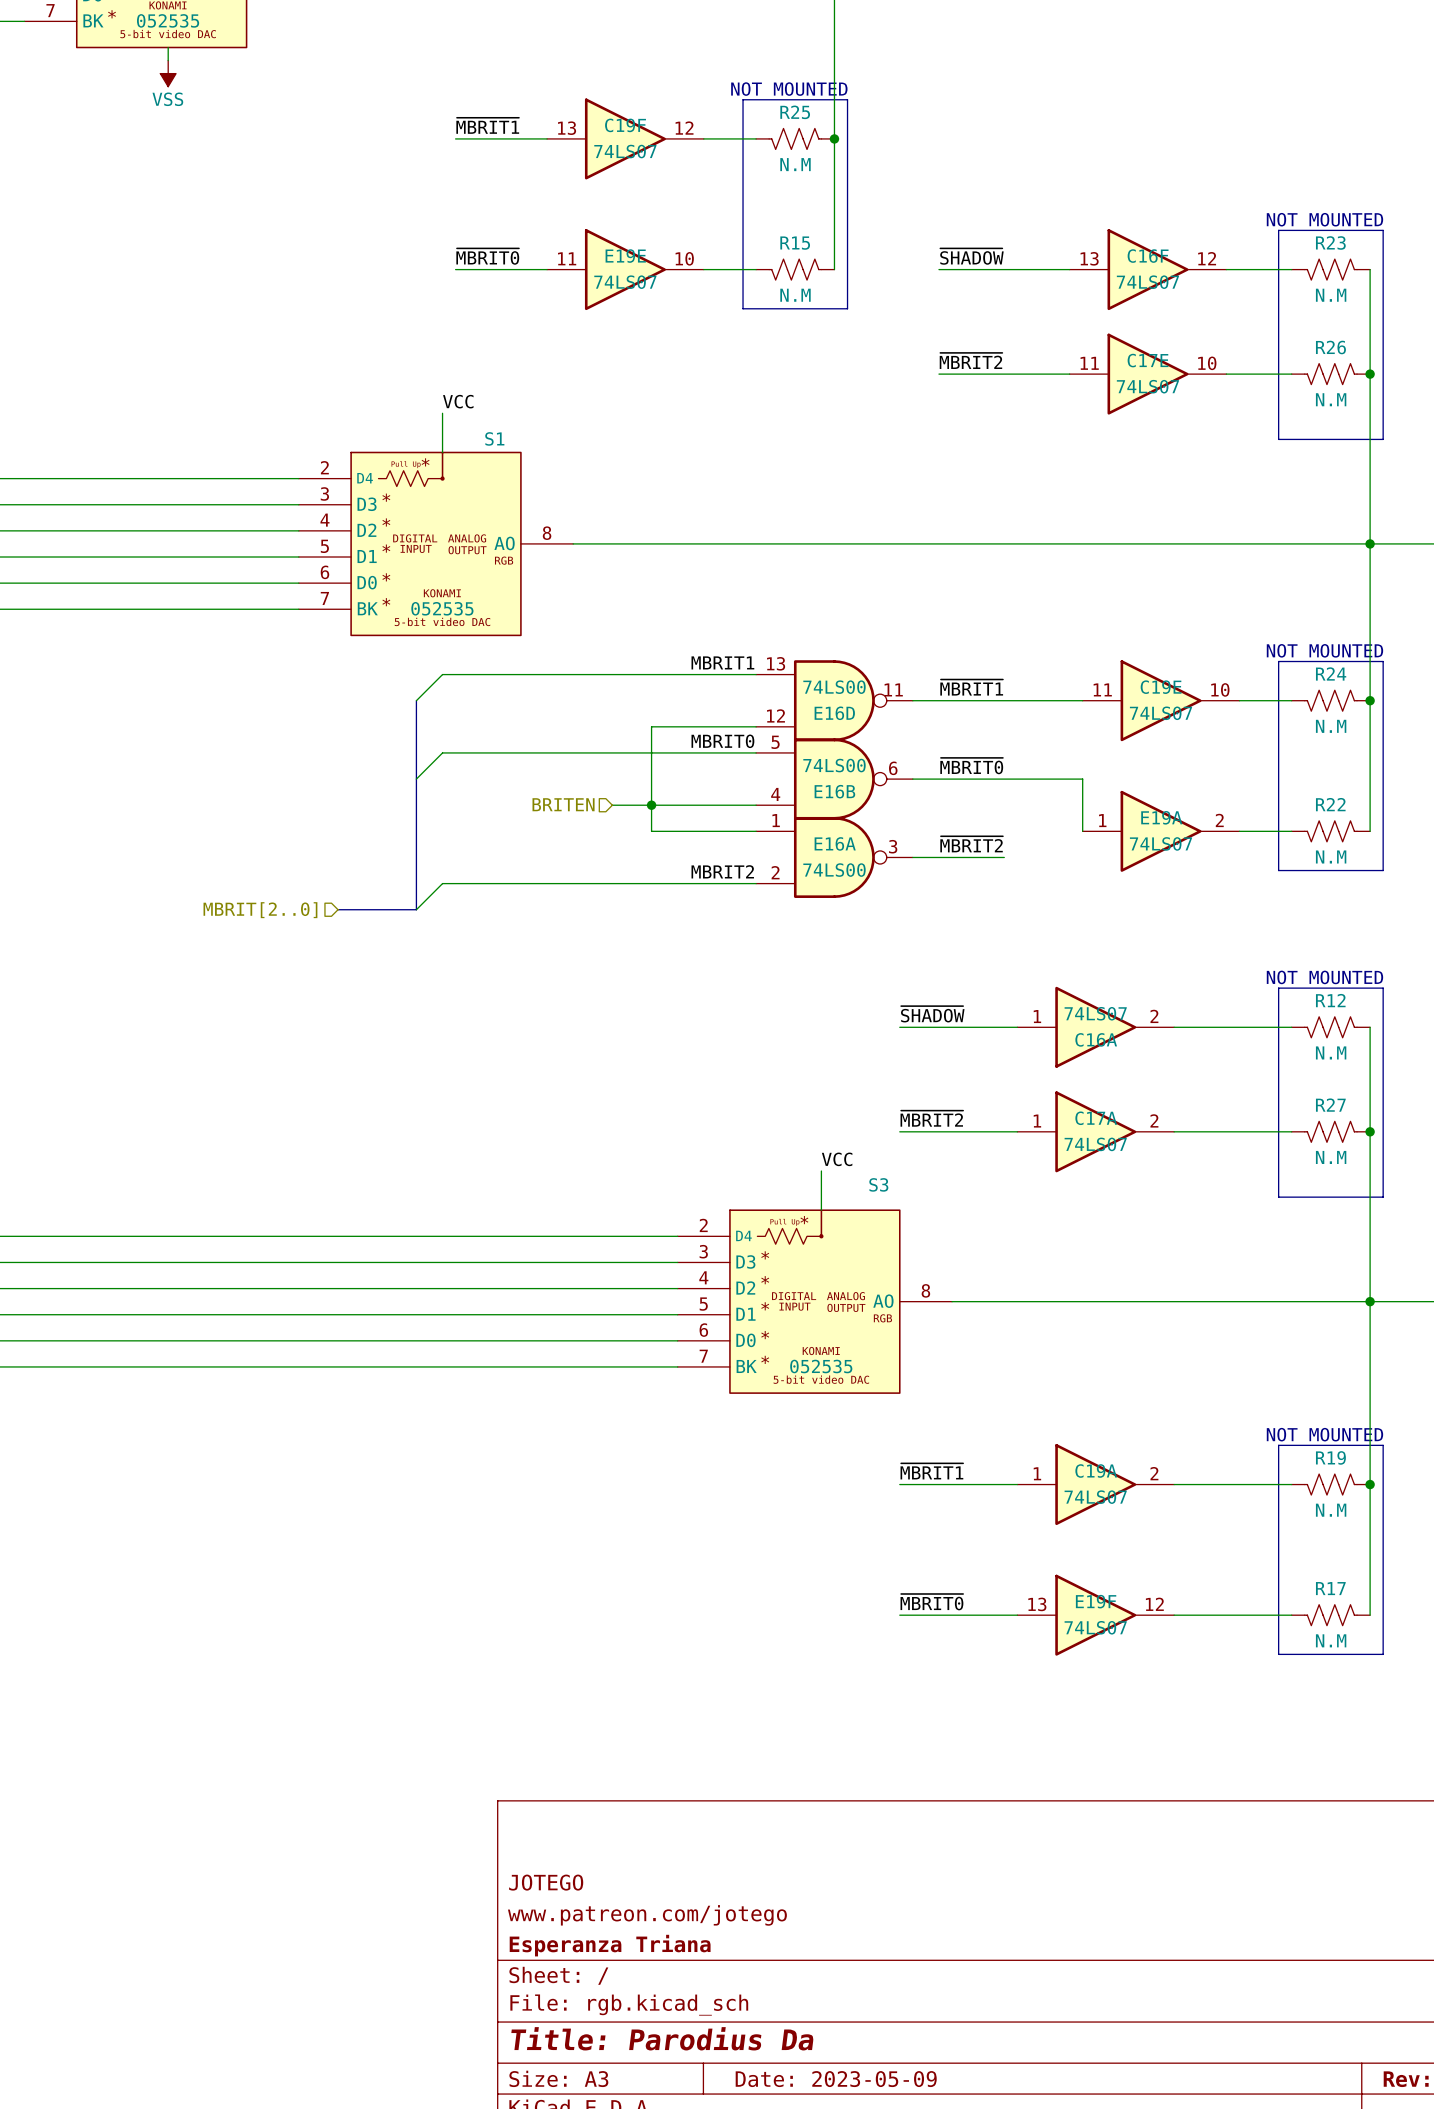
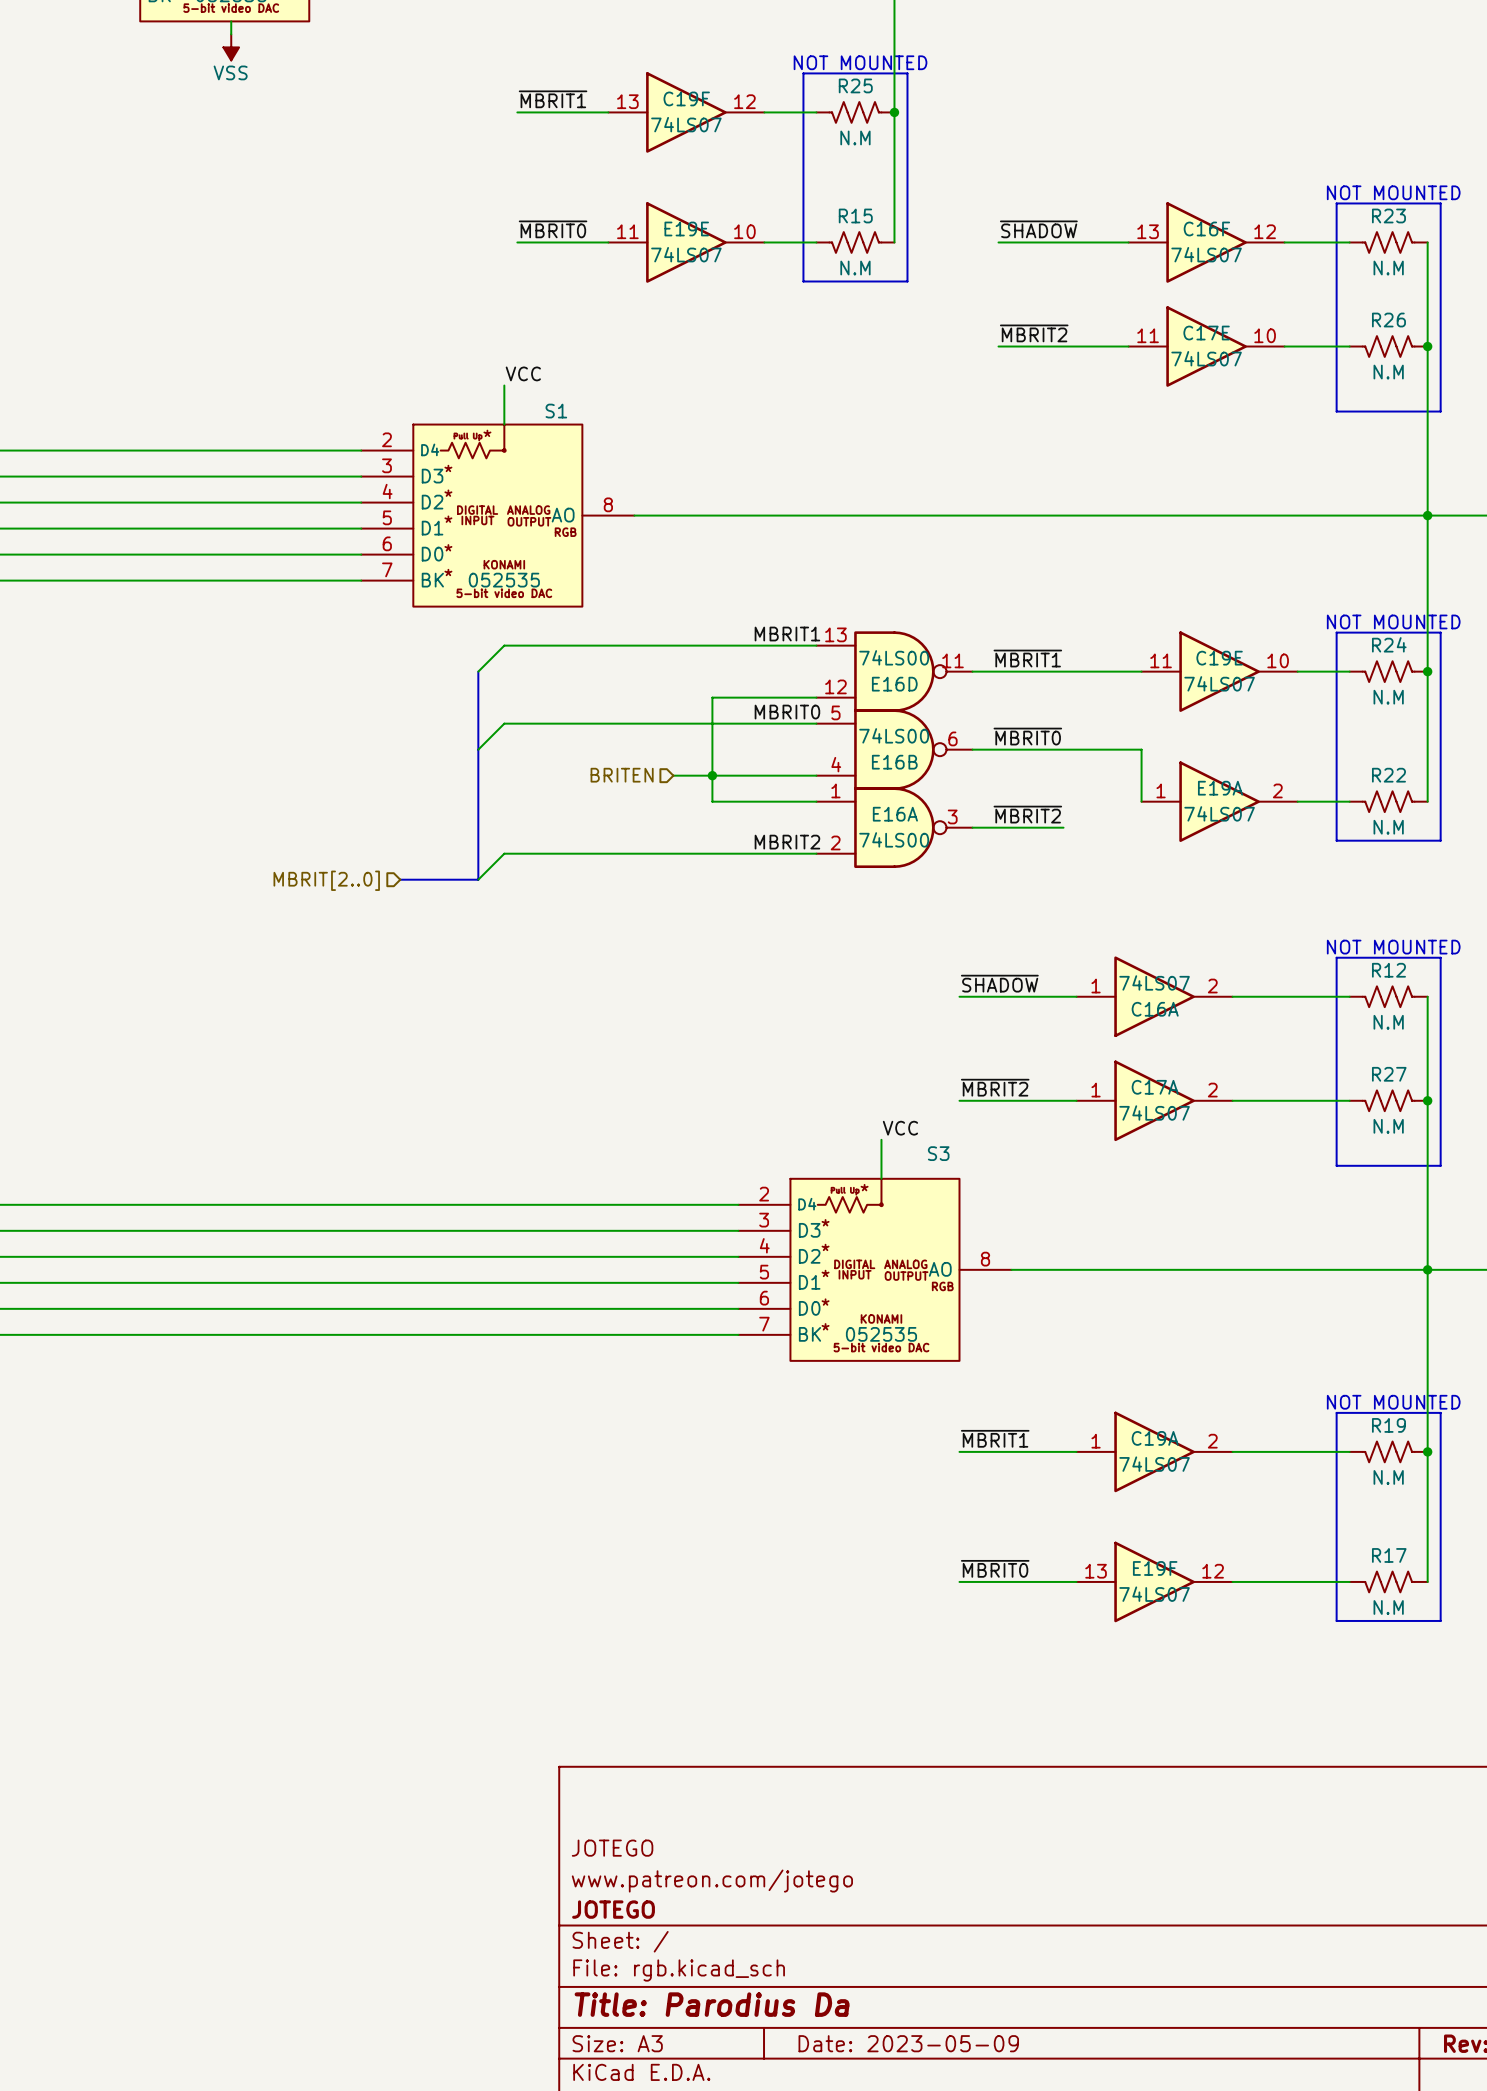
title block: Esperanza Triana (610, 1945) -> JOTEGO (613, 1909)

